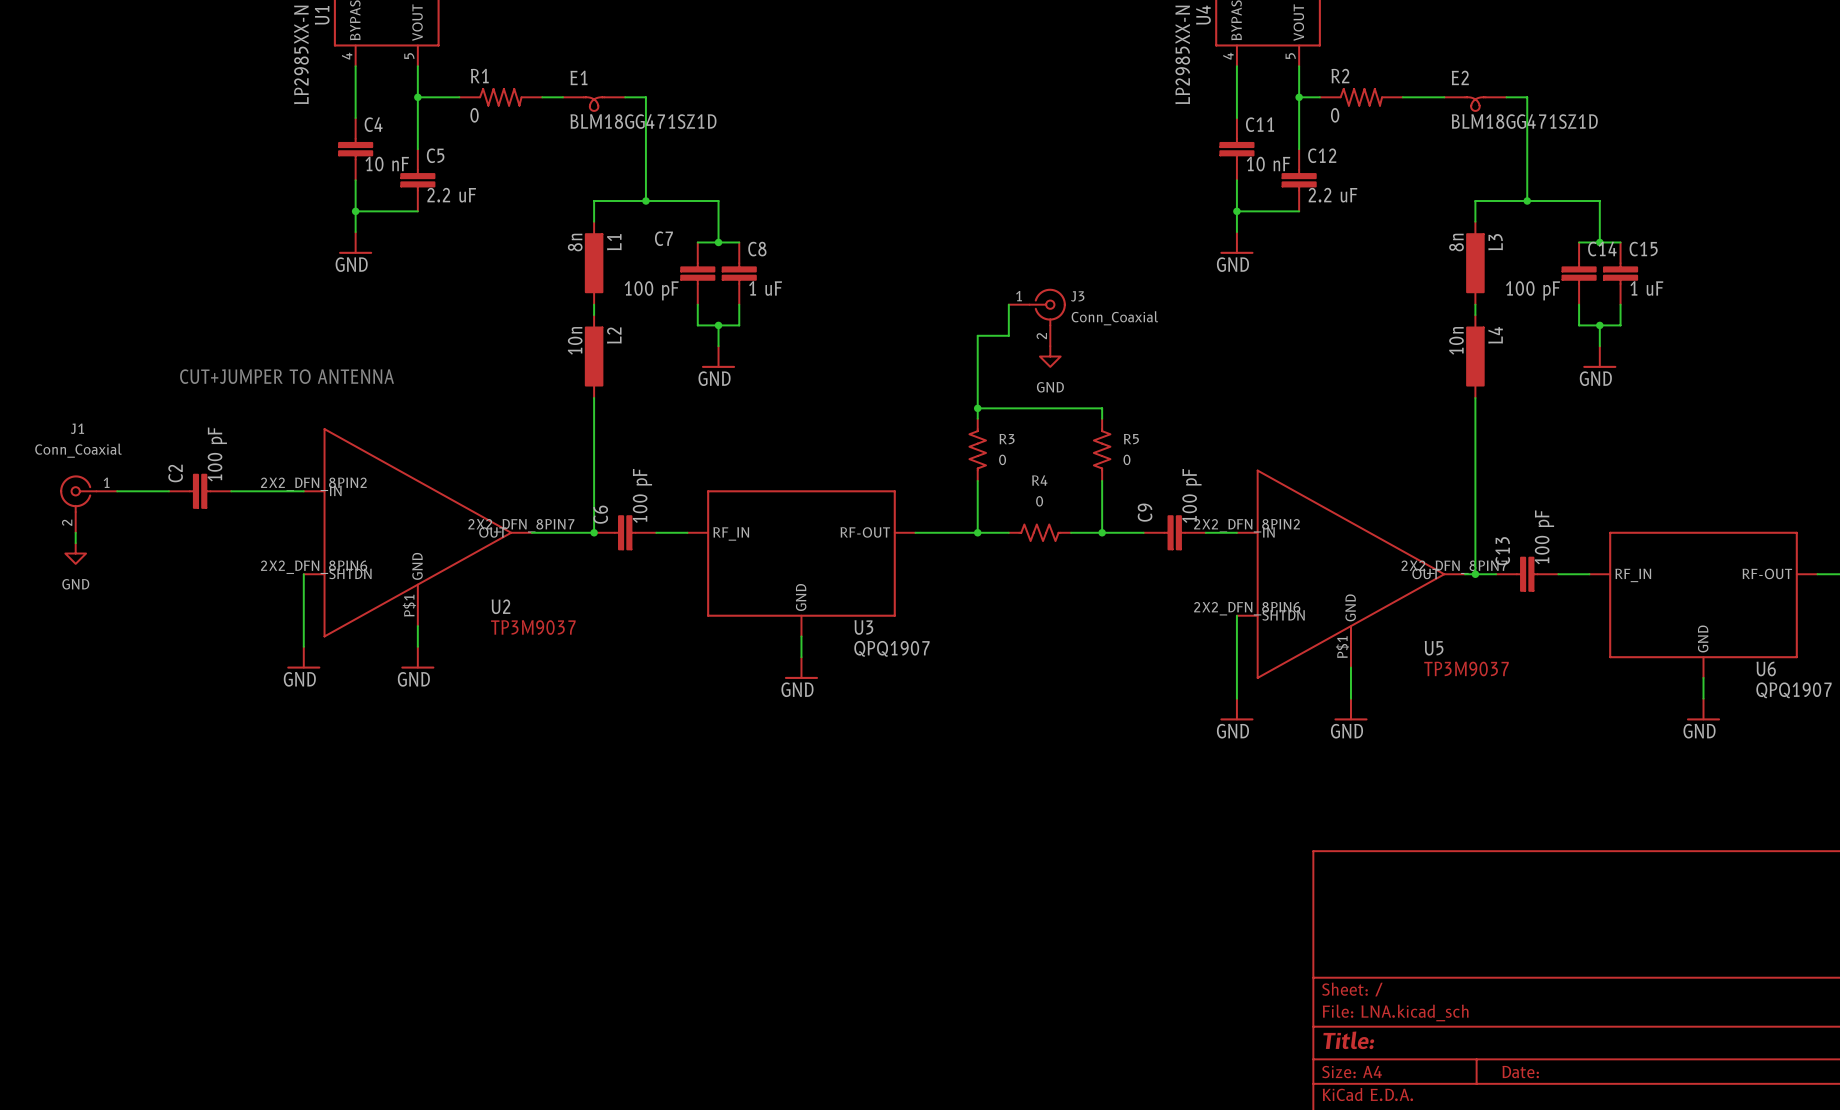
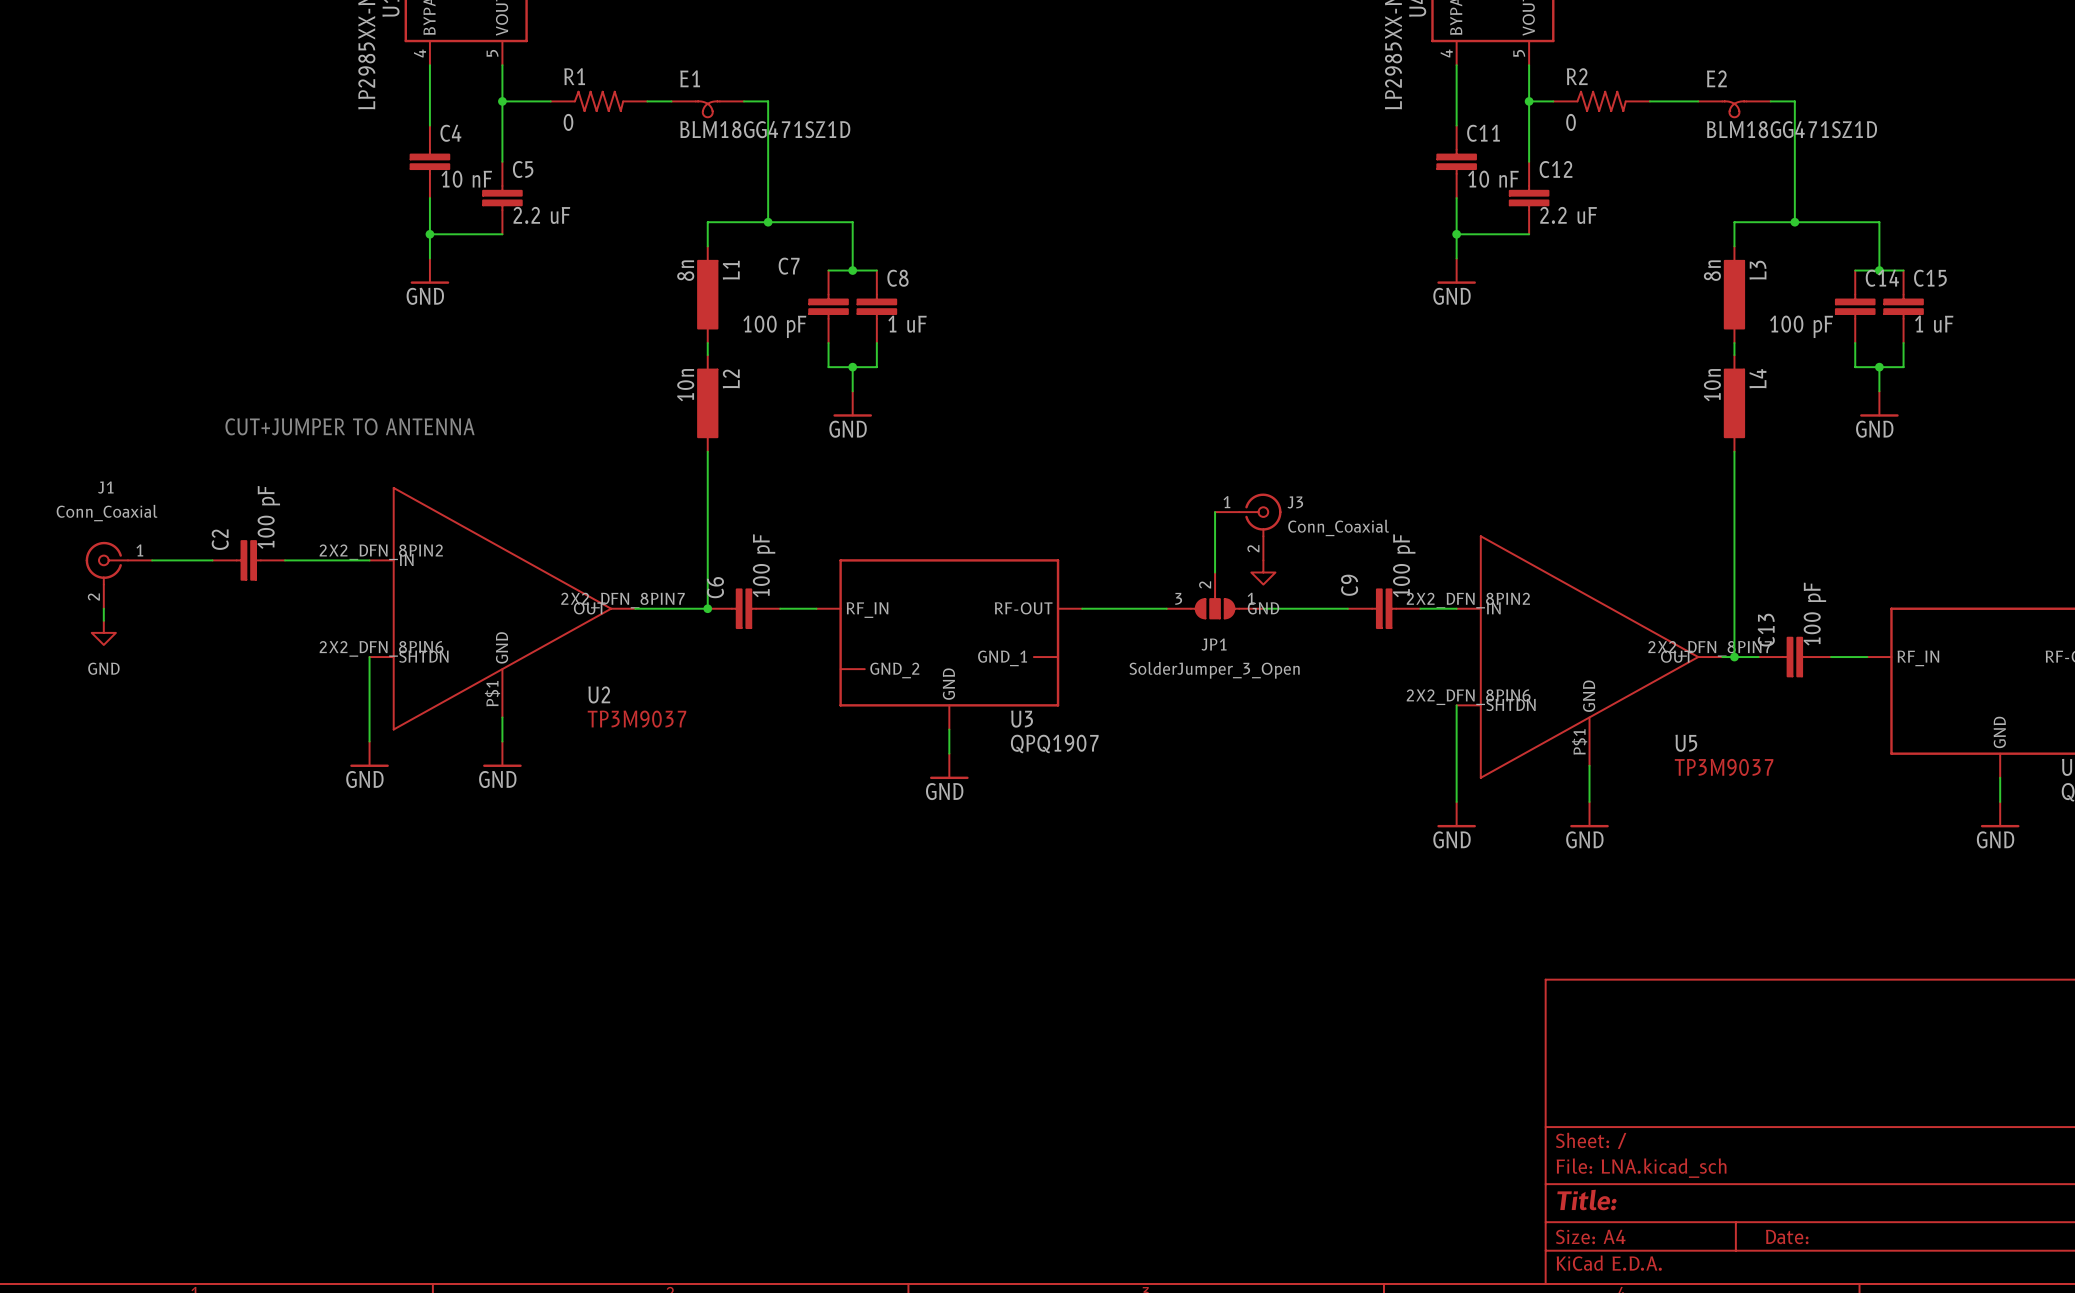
wire: (1008, 304) (1008, 335) (977, 335) (977, 418) -> none
J3 position: (1037, 317) -> (1248, 526)
power symbol position: GND (1050, 356) -> GND (1263, 572)
wire: (977, 408) (1102, 408) (1102, 418) -> none
junction: (977, 408) -> none
R3: 0 (977, 449) -> none
R5: 0 (1102, 449) -> none
wire: (977, 480) (977, 532) -> (1215, 512) (1215, 572)
wire: (1102, 480) (1102, 532) -> none
U3 symbol: [687, 490, 916, 637] -> [816, 559, 1083, 730]
JP1: none -> SolderJumper_3_Open (1215, 595)
junction: (977, 532) -> none
R4: 0 (1039, 532) -> none
junction: (1102, 532) -> none

